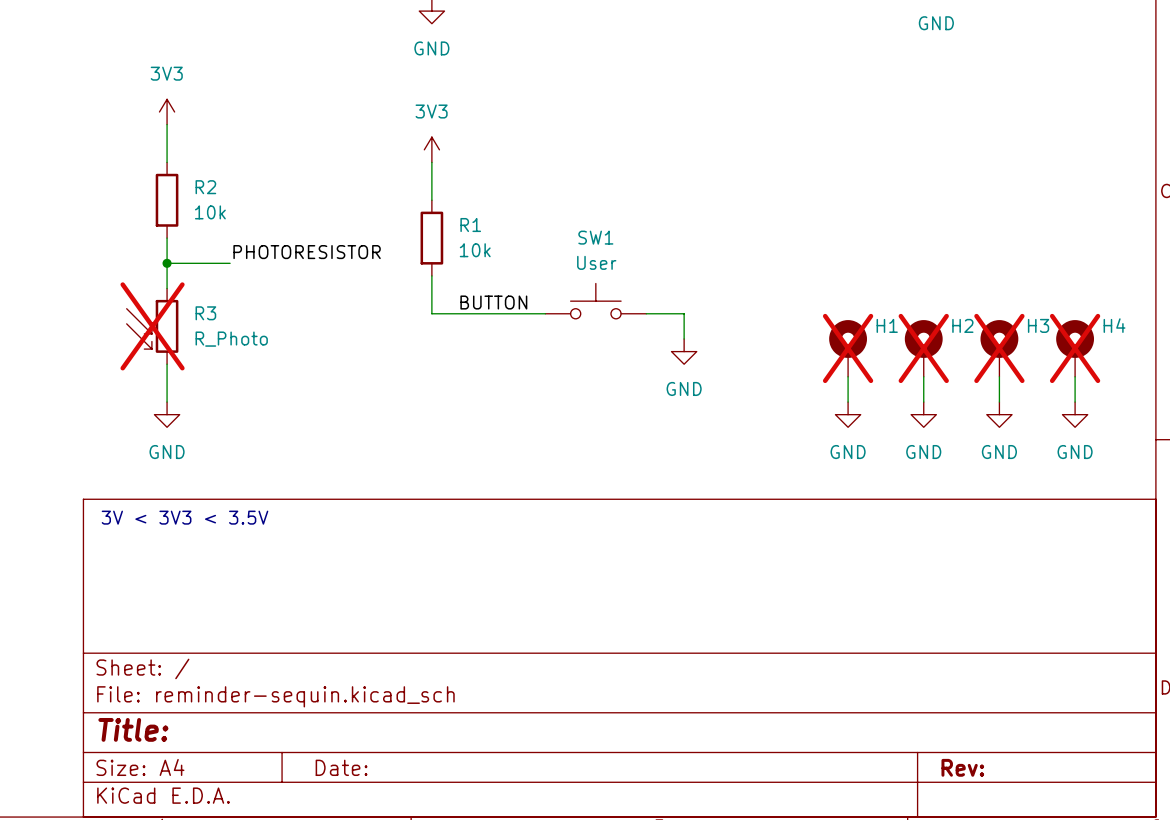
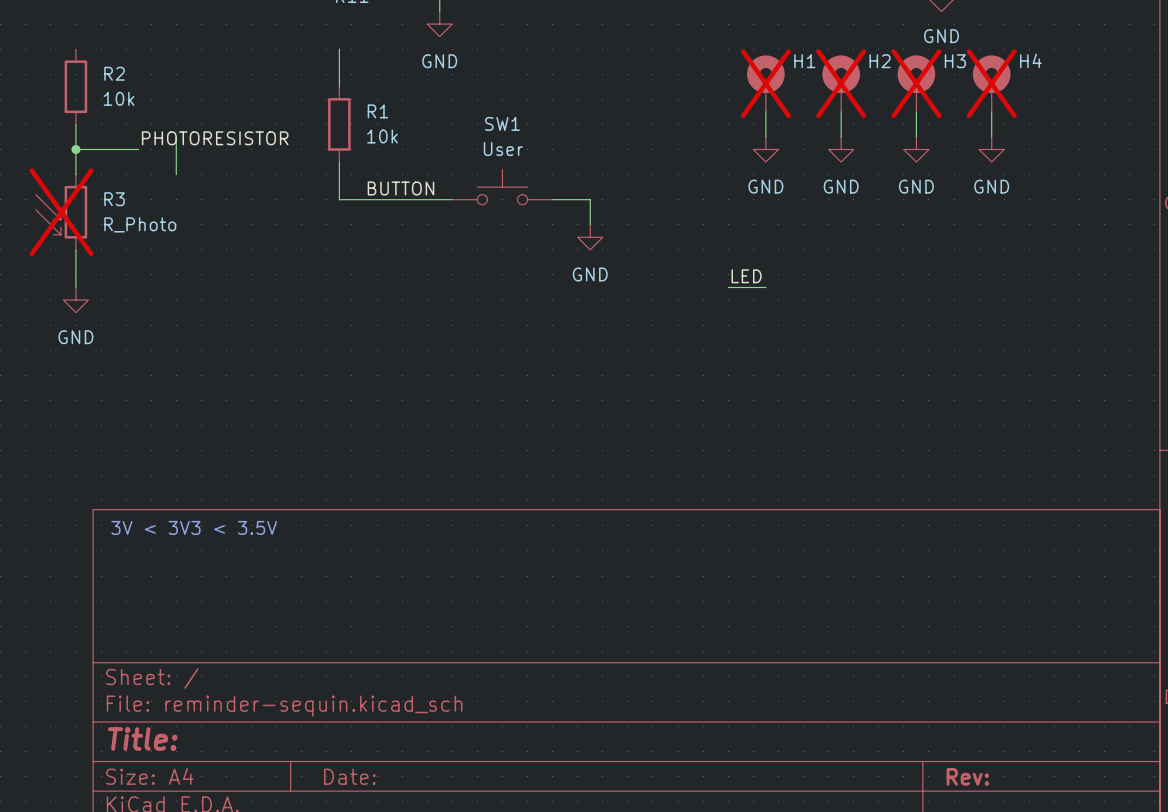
wire: none -> (765, 111) (765, 136)
wire: none -> (841, 111) (841, 136)
wire: none -> (916, 111) (916, 136)
wire: none -> (991, 111) (991, 136)
power symbol: 3V3 (167, 111) -> none
junction: none -> (75, 149)
power symbol: none -> GND (765, 149)
power symbol: none -> GND (841, 149)
power symbol: none -> GND (916, 149)
power symbol: none -> GND (991, 149)
power symbol: 3V3 (431, 149) -> none
wire: (431, 162) (431, 200) -> (339, 49) (339, 86)
R2 position: (167, 200) -> (75, 86)
power symbol: none -> GND (590, 237)
wire: (167, 238) (167, 288) -> (75, 124) (75, 174)
R1 position: (431, 238) -> (339, 124)
label position: PHOTORESISTOR (307, 252) -> PHOTORESISTOR (215, 138)
wire: (167, 263) (230, 263) -> (75, 149) (138, 149)
junction: (167, 263) -> none
label: none -> LED (746, 276)
wire: (431, 275) (431, 313) (545, 313) -> (339, 162) (339, 199) (452, 199)
wire: none -> (728, 287) (765, 287)
SW1 position: (595, 301) -> (502, 187)
label position: BUTTON (493, 302) -> BUTTON (400, 188)
wire: (646, 313) (684, 313) (684, 338) -> (552, 199) (590, 199) (590, 224)
R3 position: (152, 326) -> (61, 212)
H1 position: (848, 348) -> (765, 83)
H2 position: (923, 348) -> (841, 83)
H3 position: (999, 348) -> (916, 83)
H4 position: (1075, 348) -> (991, 83)
power symbol: GND (684, 351) -> none
wire: (167, 364) (167, 402) -> (75, 249) (75, 287)
wire: (848, 376) (848, 402) -> none
wire: (923, 376) (923, 402) -> none
wire: (999, 376) (999, 402) -> none
wire: (1075, 376) (1075, 402) -> none
power symbol position: GND (167, 414) -> GND (75, 300)
power symbol: GND (848, 414) -> none
power symbol: GND (923, 414) -> none
power symbol: GND (999, 414) -> none
power symbol: GND (1075, 414) -> none

